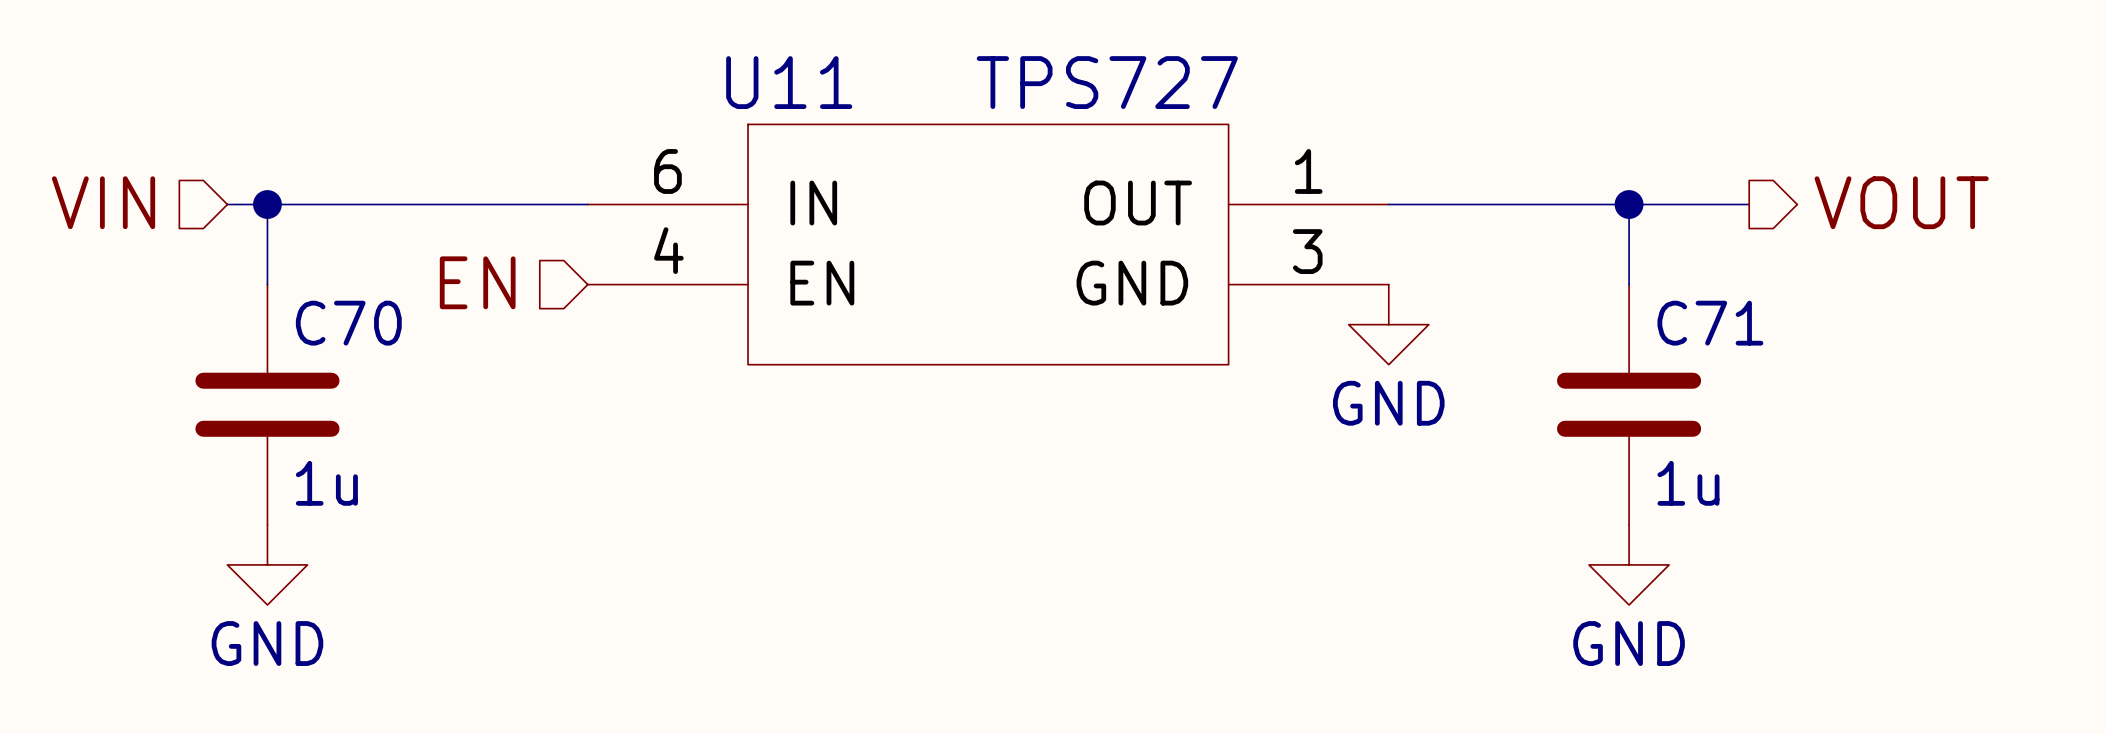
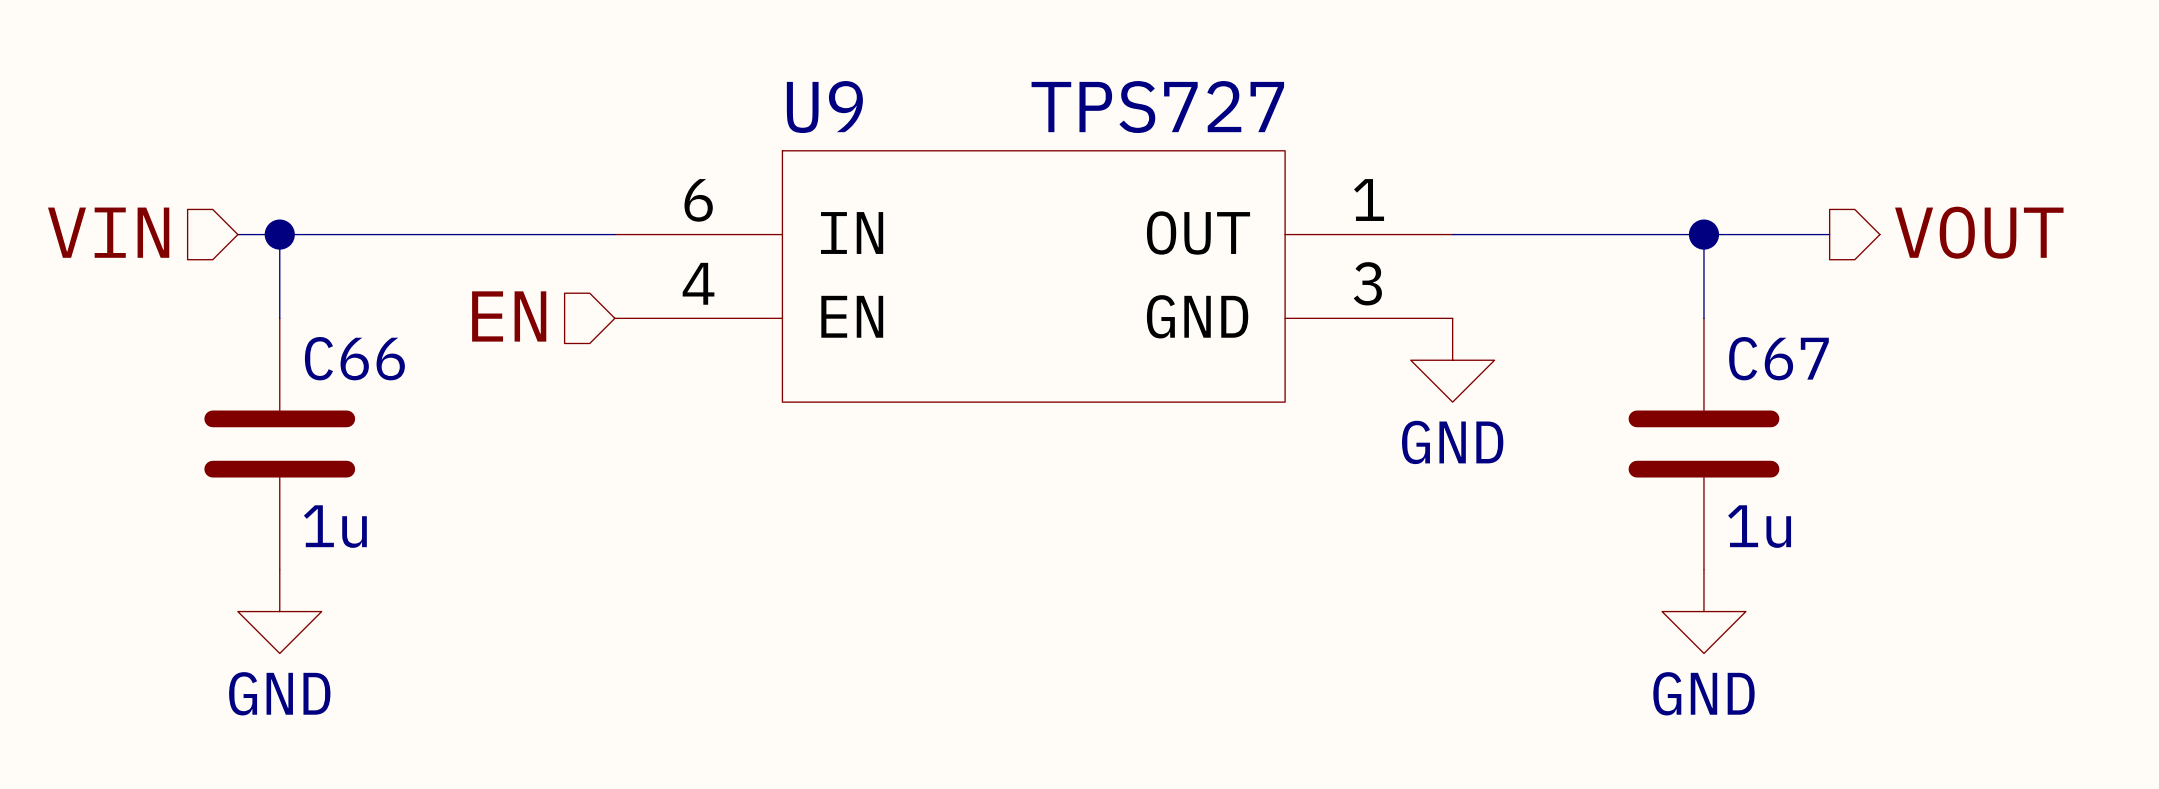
U11 name: U11 (789, 82) -> U9 (824, 107)
C70 name: C70 (348, 323) -> C66 (354, 358)
C71 name: C71 (1710, 323) -> C67 (1778, 358)

